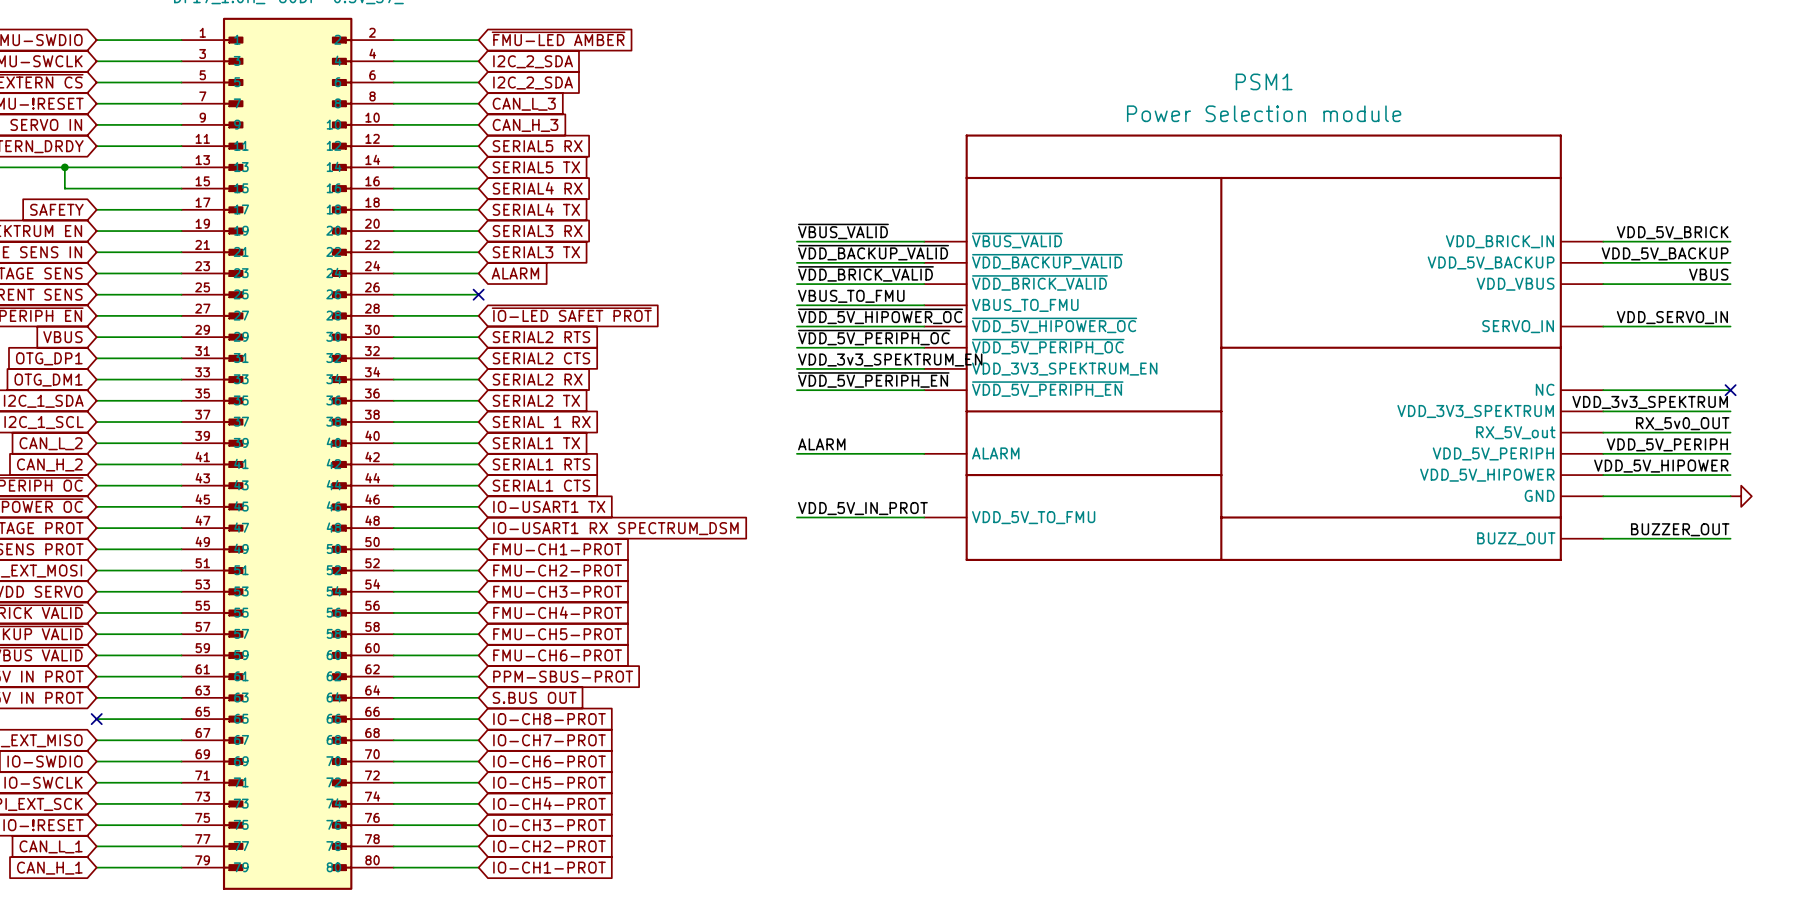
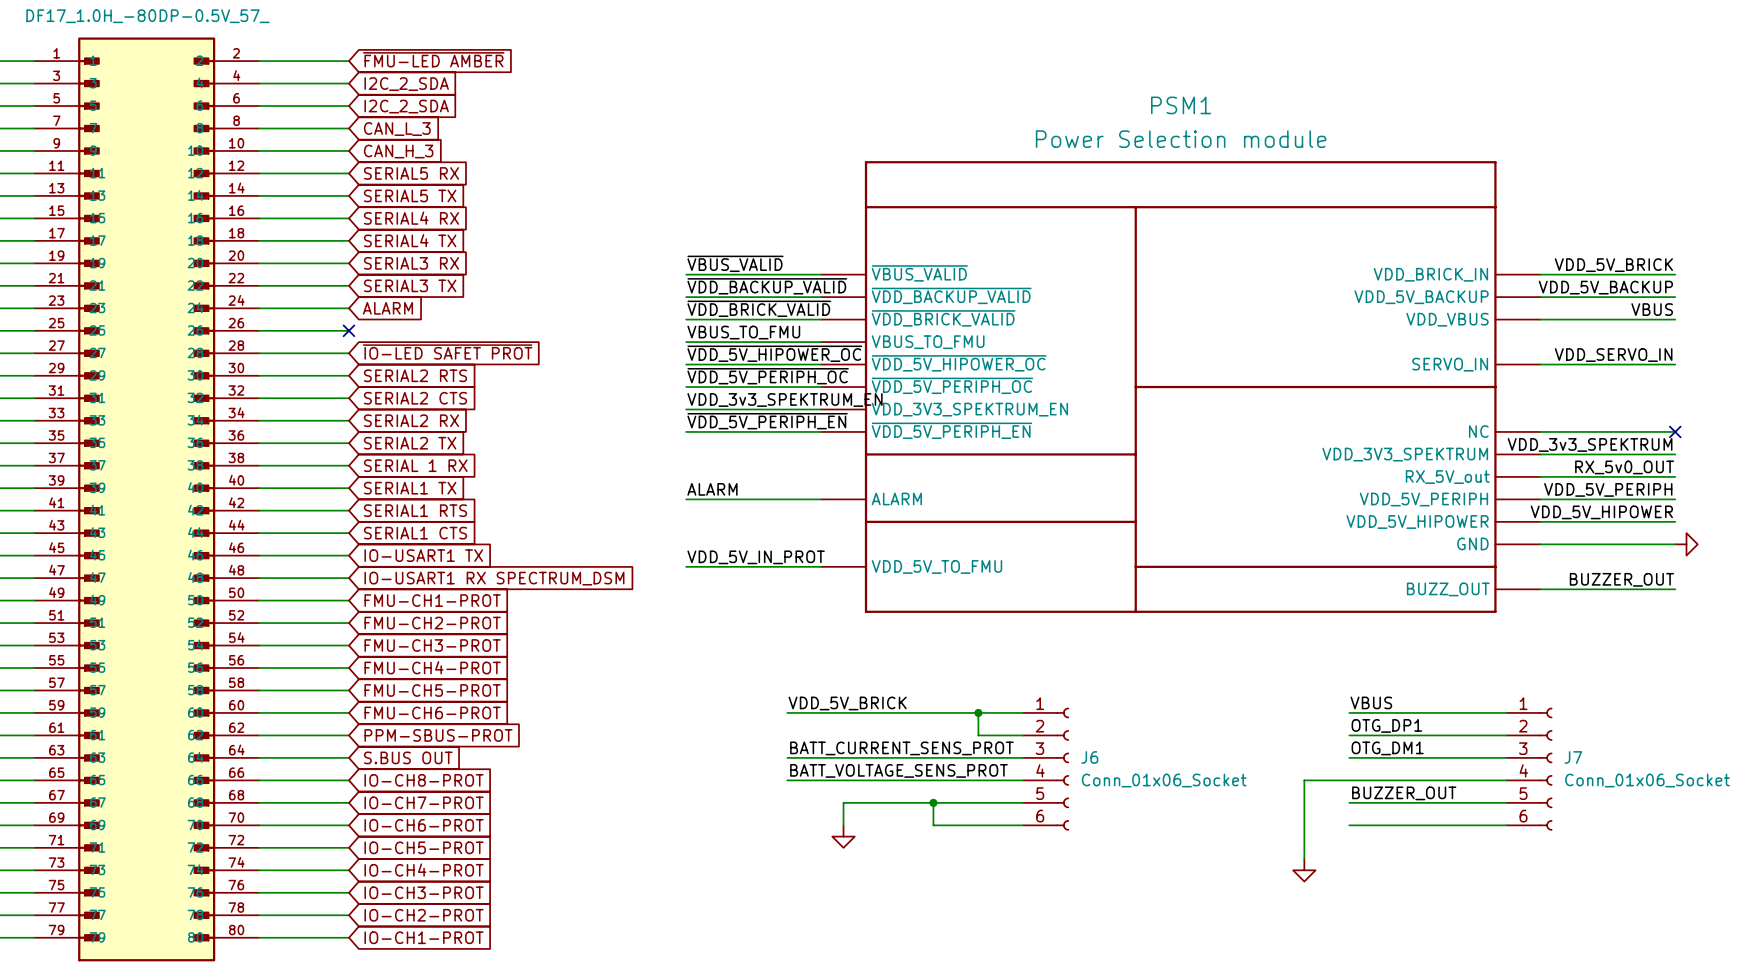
label: none -> VBUS (1371, 702)
label: none -> VDD_5V_BRICK (847, 703)
wire: none -> (787, 712) (1023, 712)
wire: none -> (978, 712) (978, 735) (1023, 735)
junction: none -> (978, 712)
wire: none -> (1349, 712) (1506, 712)
label: none -> OTG_DP1 (1386, 725)
wire: none -> (1349, 735) (1506, 735)
label: none -> BATT_CURRENT_SENS_PROT (901, 748)
label: none -> OTG_DM1 (1387, 748)
wire: none -> (787, 757) (1023, 757)
wire: none -> (1349, 757) (1506, 757)
J6: none -> Conn_01x06_Socket (1046, 769)
J7: none -> Conn_01x06_Socket (1529, 769)
label: none -> BATT_VOLTAGE_SENS_PROT (899, 770)
wire: none -> (787, 780) (1023, 780)
wire: none -> (1506, 780) (1304, 780) (1304, 859)
label: none -> BUZZER_OUT (1404, 793)
wire: none -> (933, 802) (933, 825) (1023, 825)
junction: none -> (933, 802)
wire: none -> (1023, 802) (843, 802) (843, 825)
wire: none -> (1349, 802) (1506, 802)
wire: none -> (1349, 825) (1506, 825)
power symbol: none -> (843, 836)
power symbol: none -> (1304, 870)

